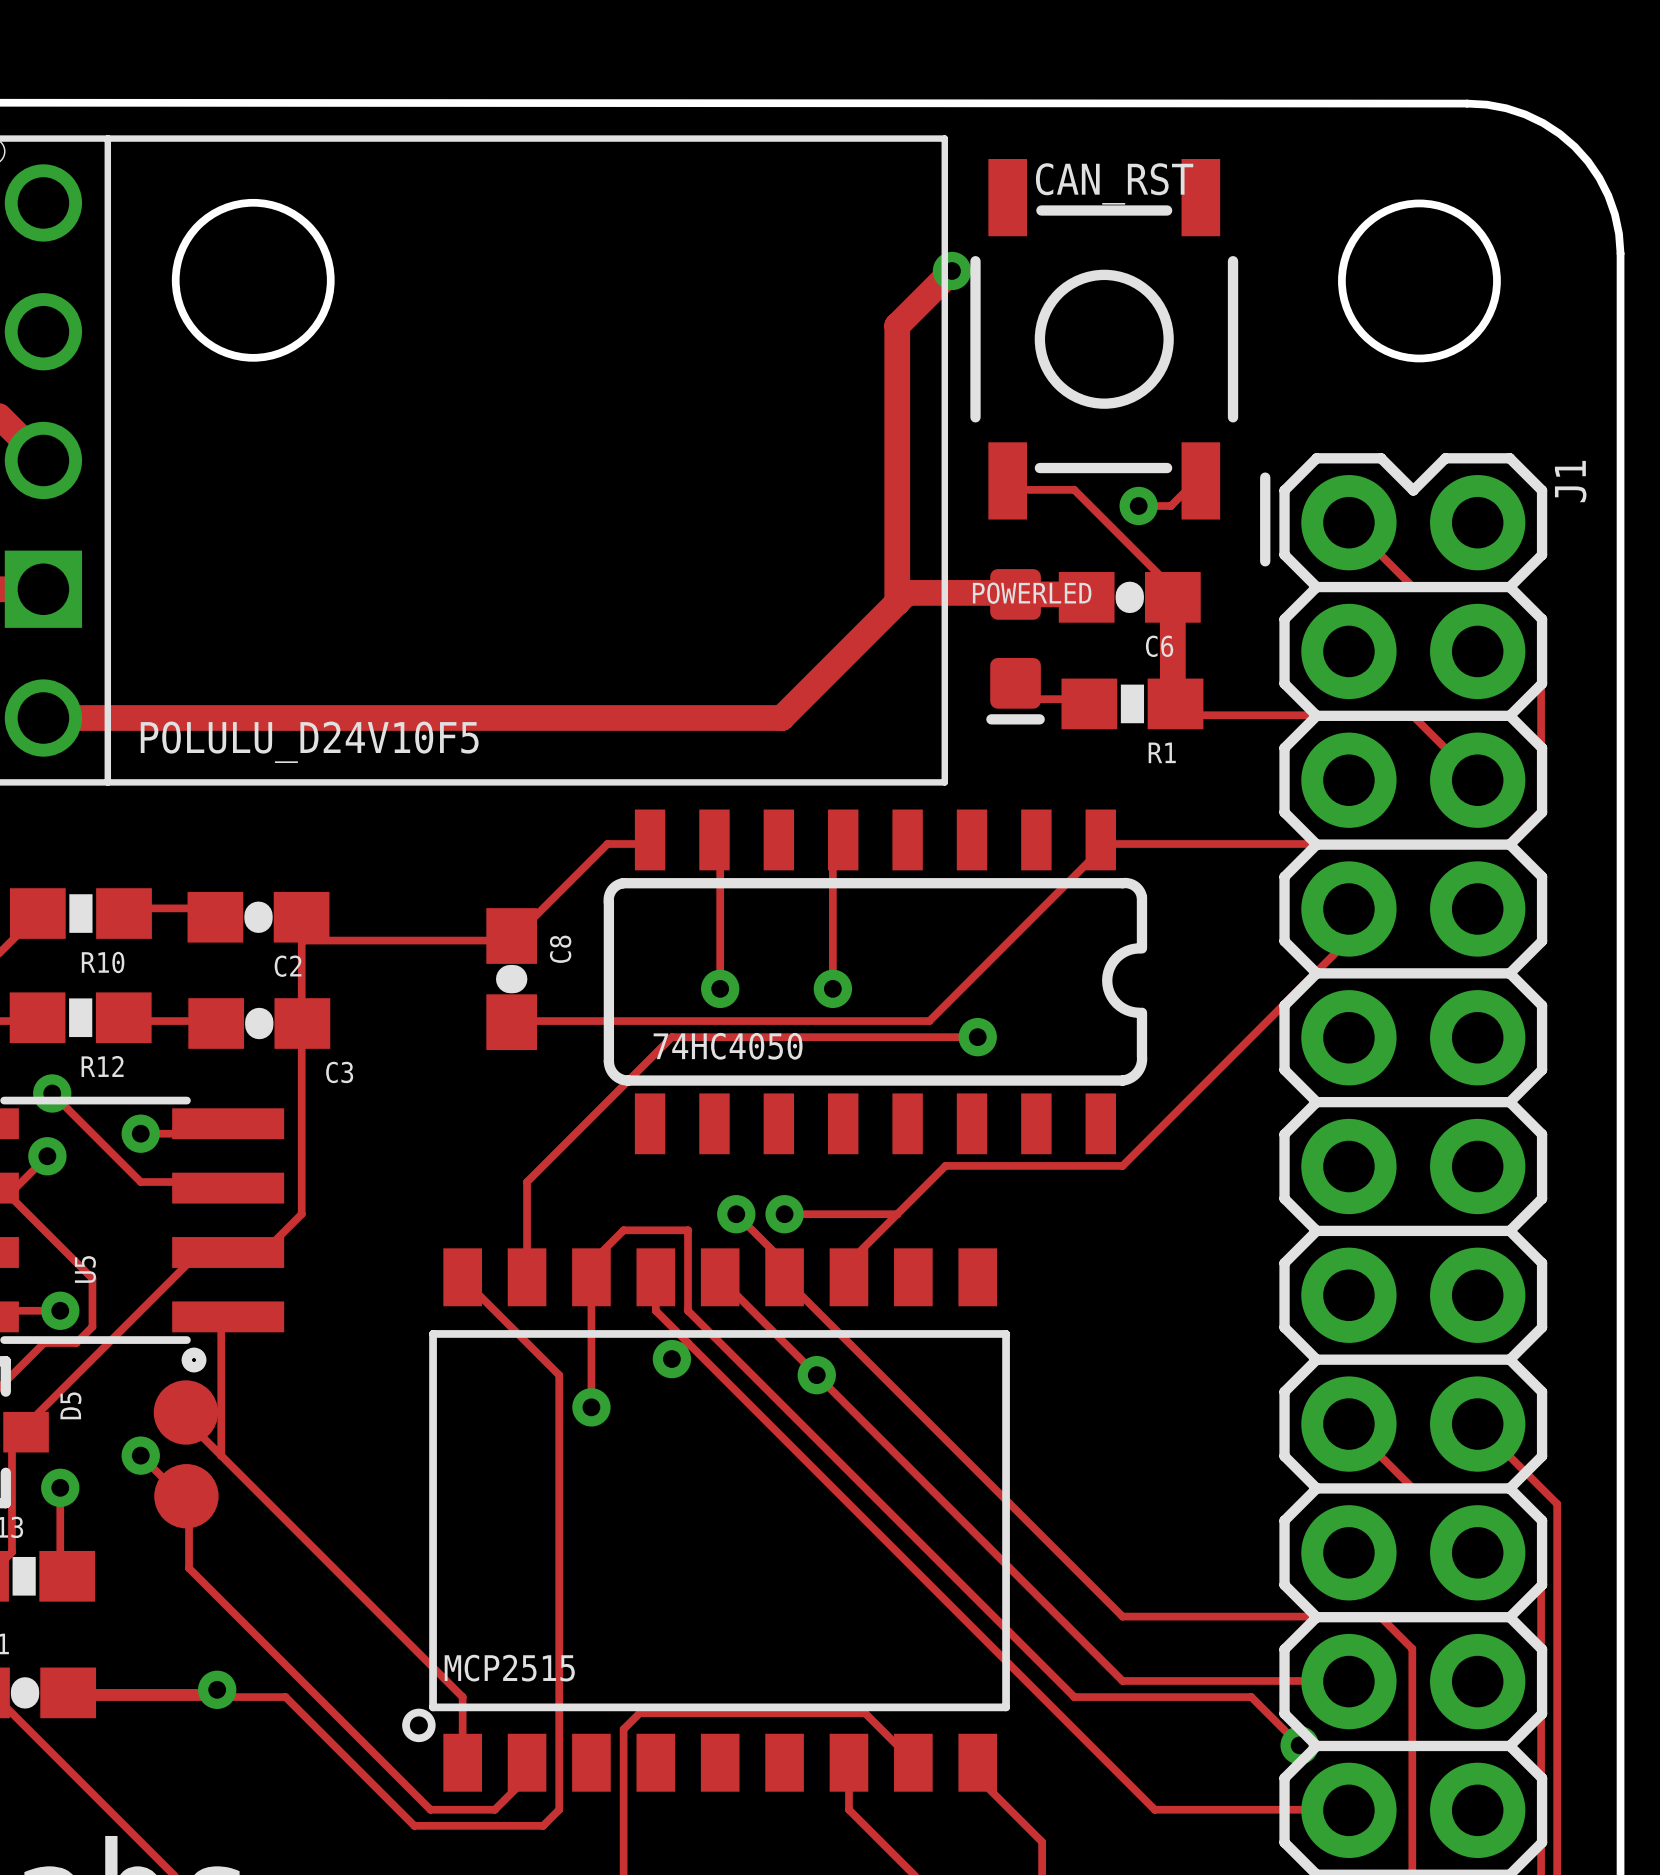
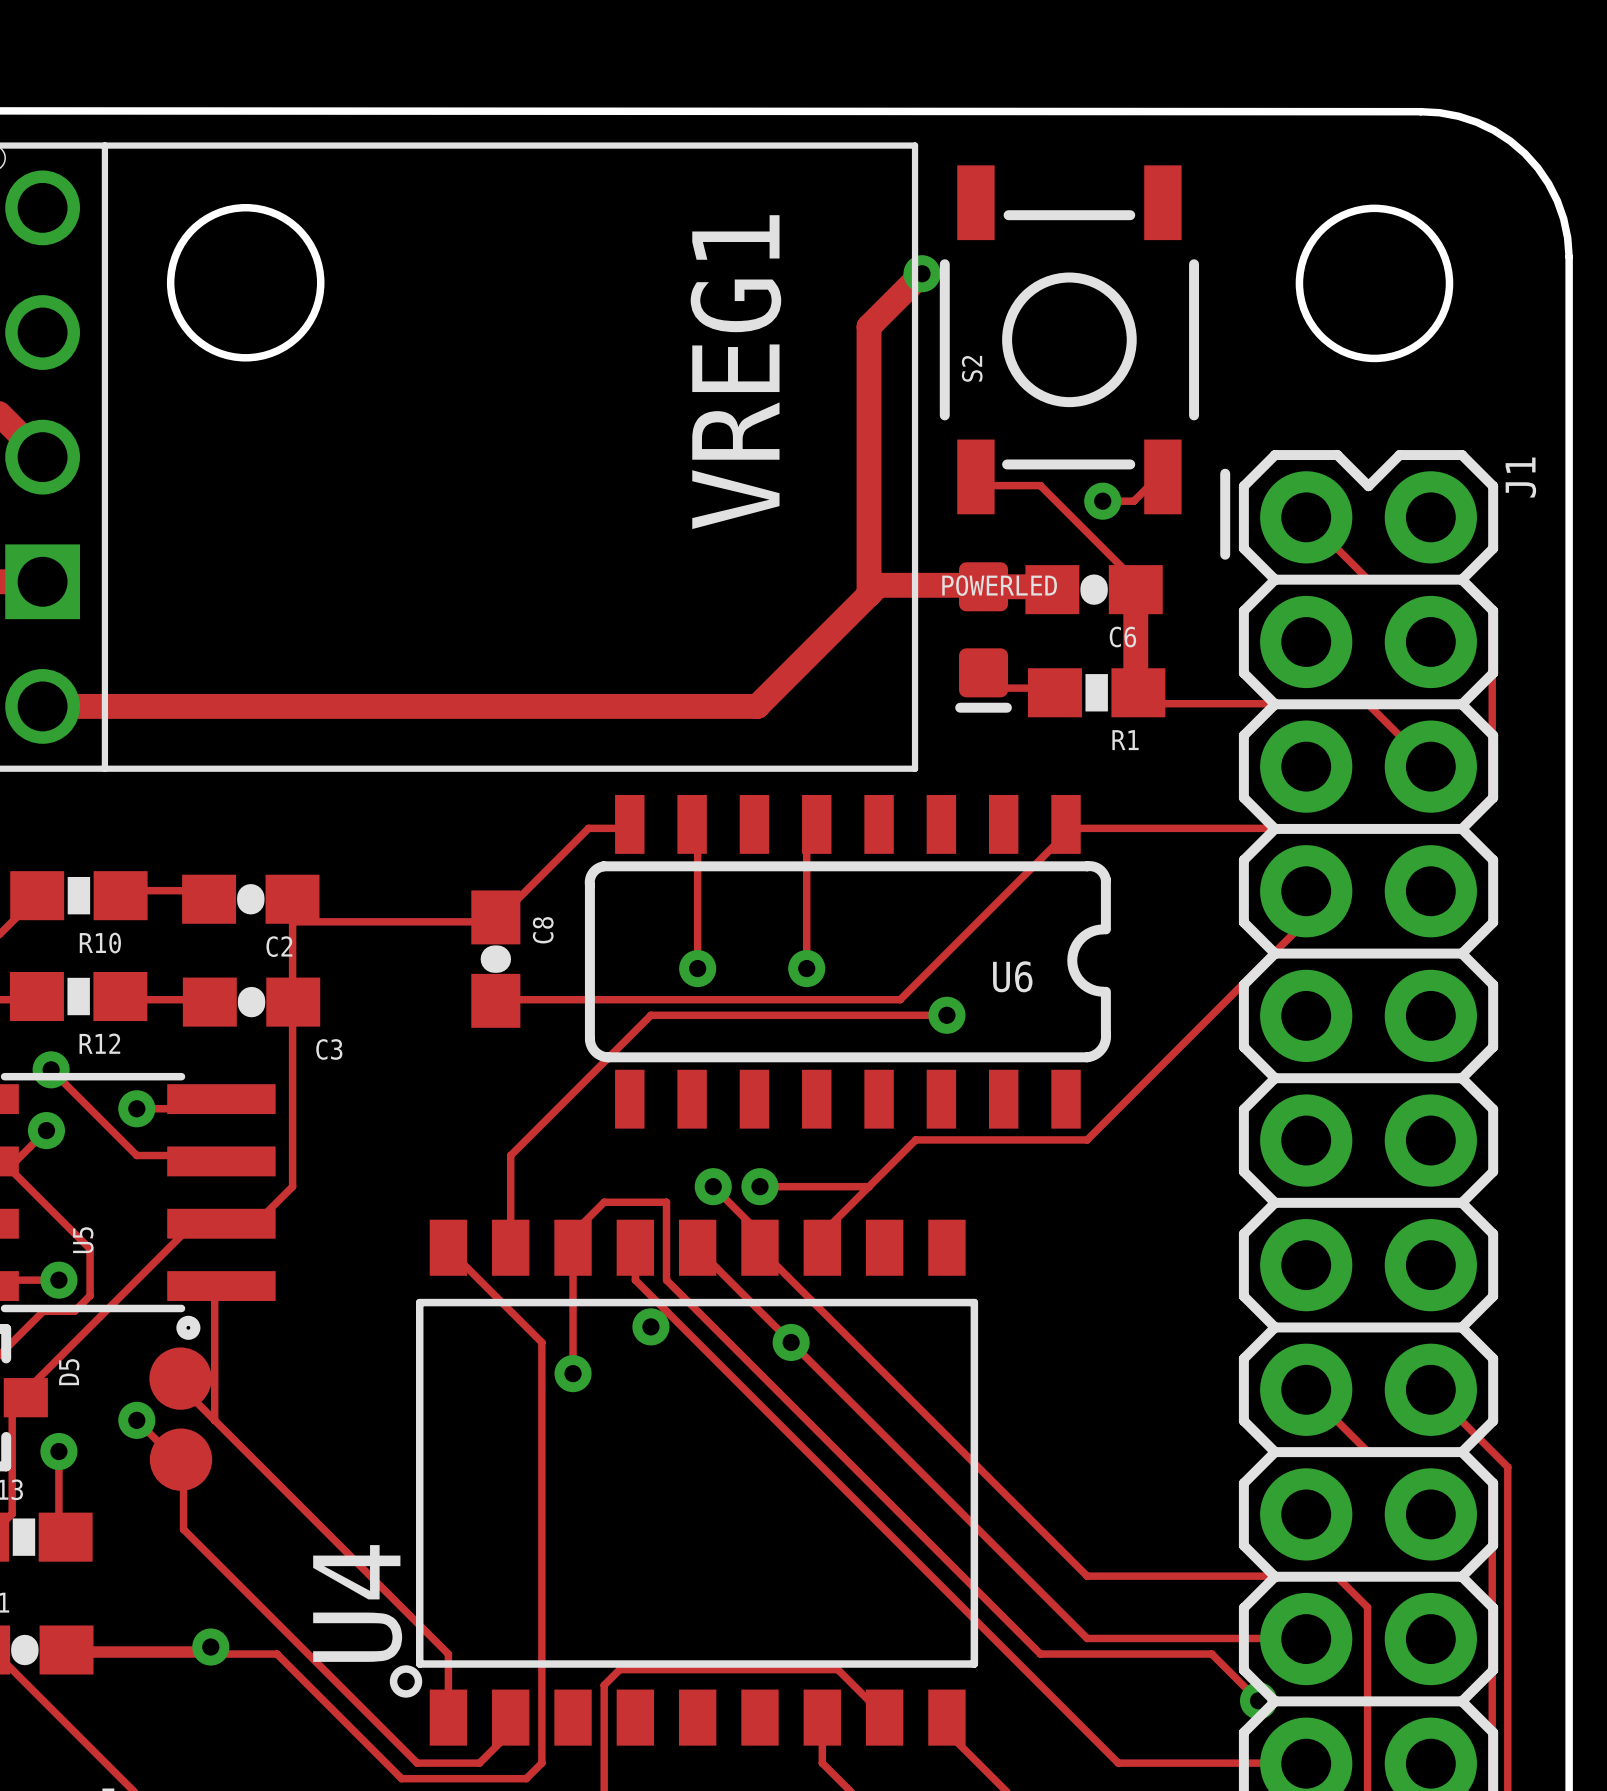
CAN_RST name: CAN_RST (1114, 183) -> S2 (972, 368)
POLULU_D24V10F5 name: POLULU_D24V10F5 (309, 742) -> VREG1 (735, 372)
74HC4050 name: 74HC4050 (728, 1046) -> U6 (1012, 976)
U4 name: none -> U4 (357, 1603)
text: MCP2515 (509, 1668) -> none

